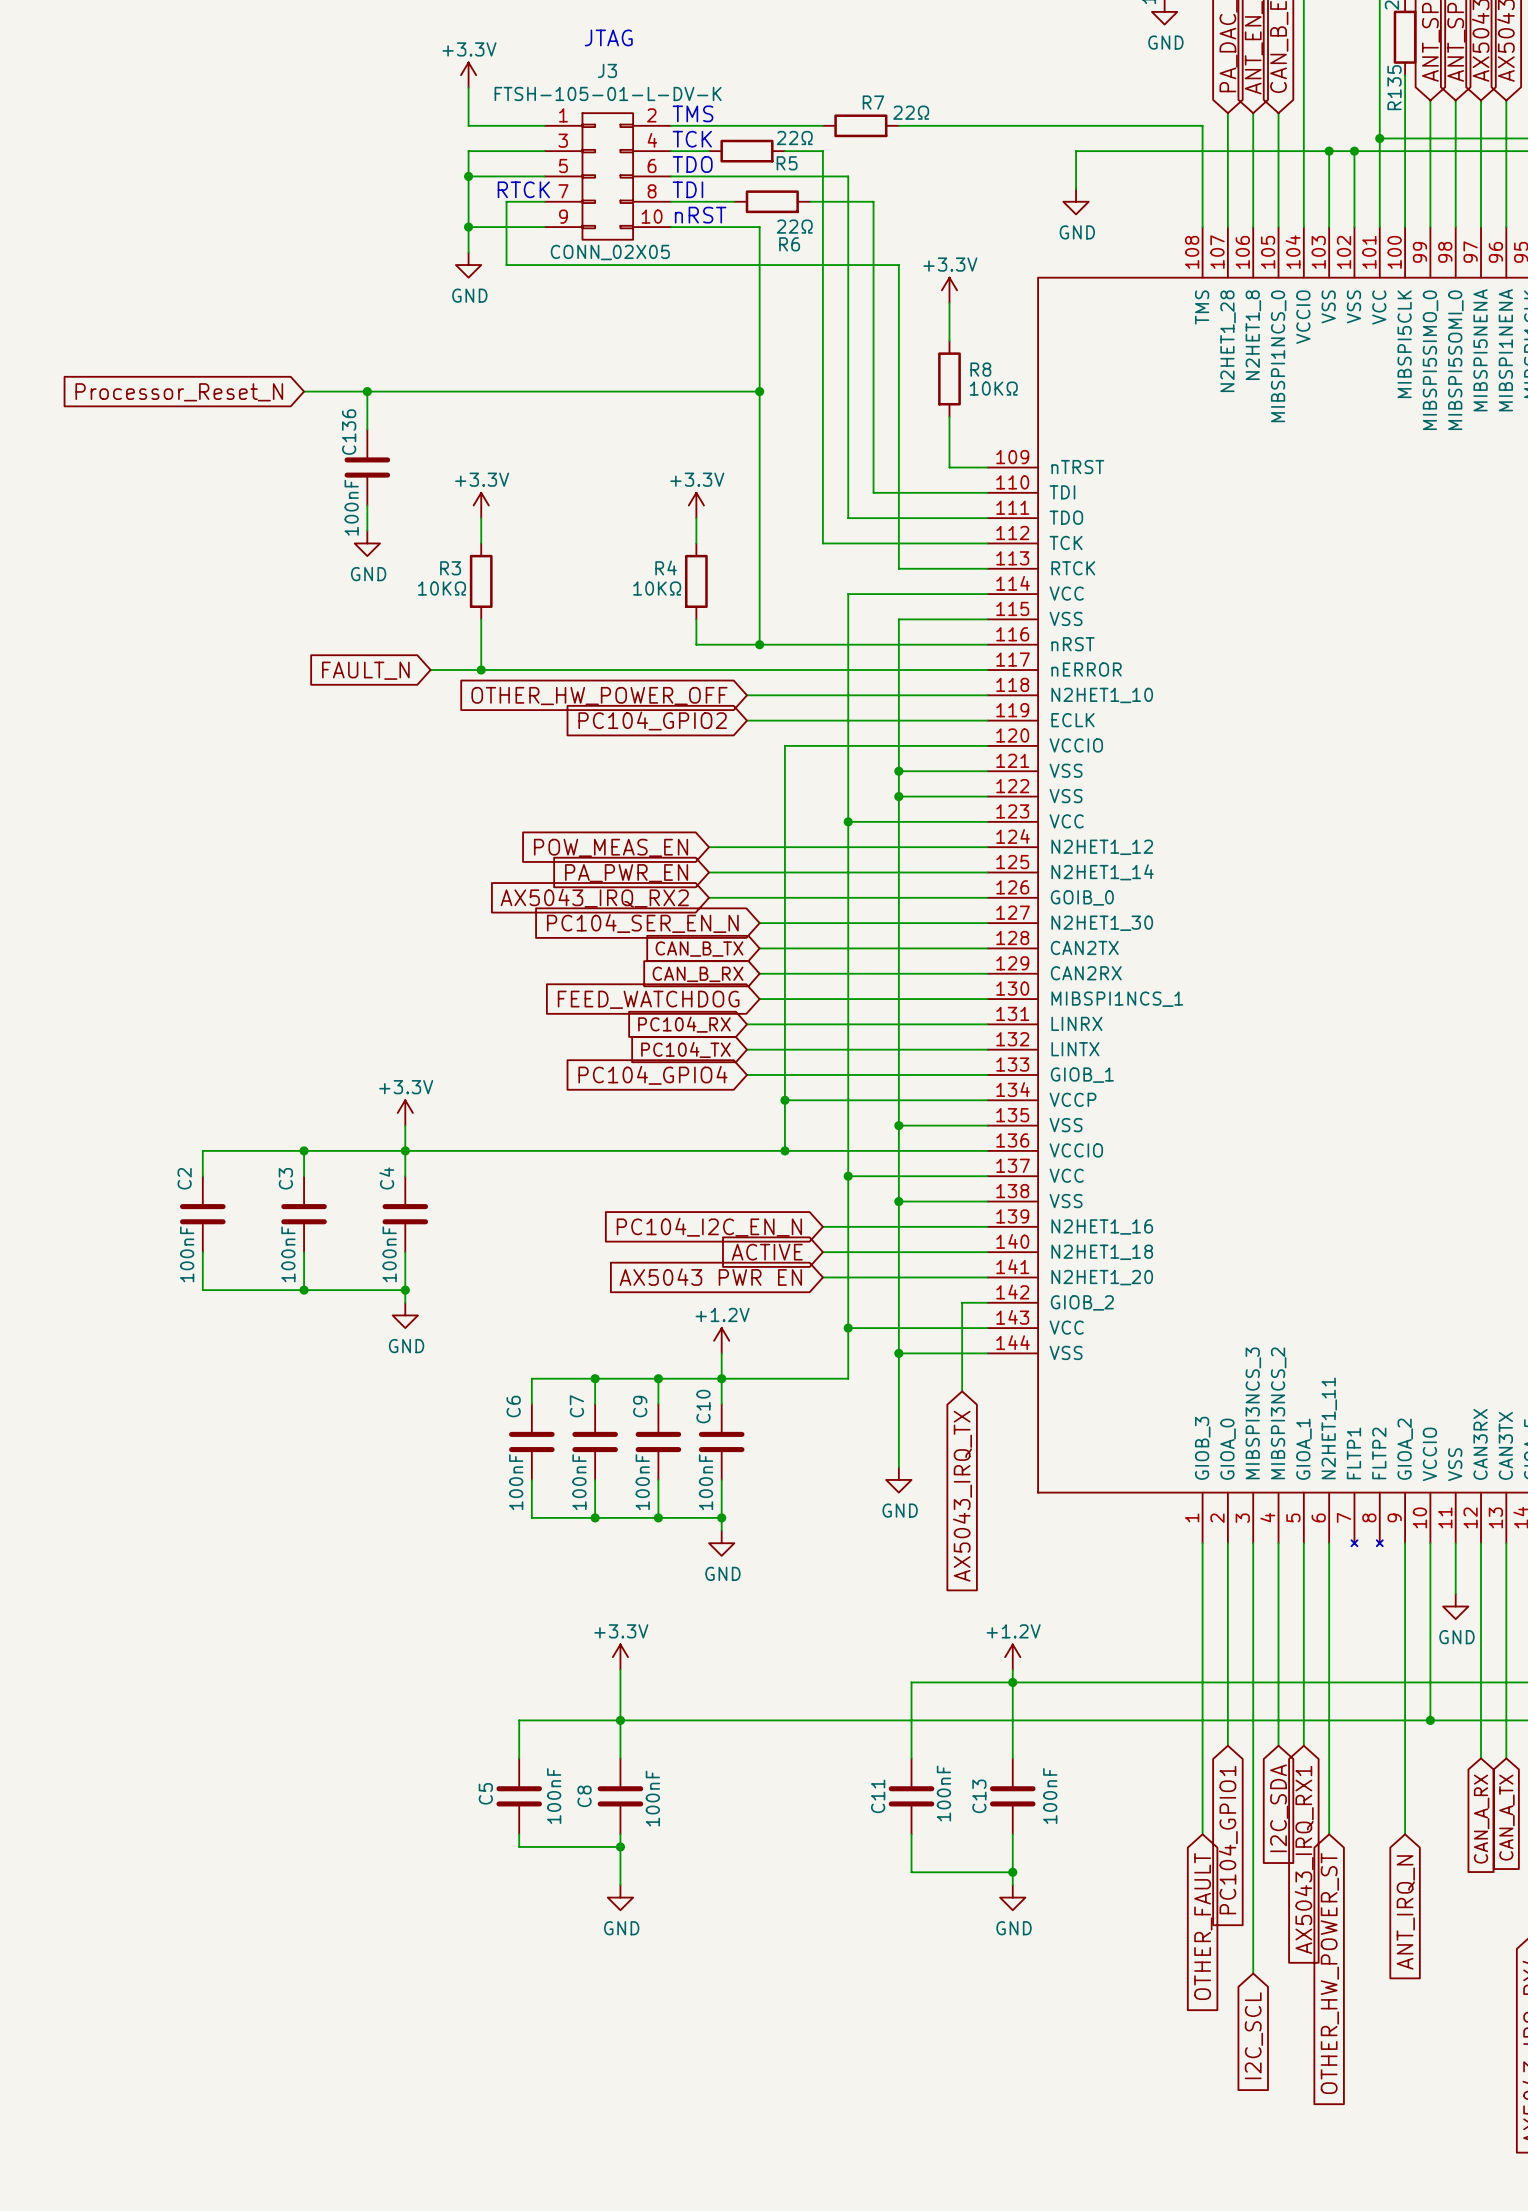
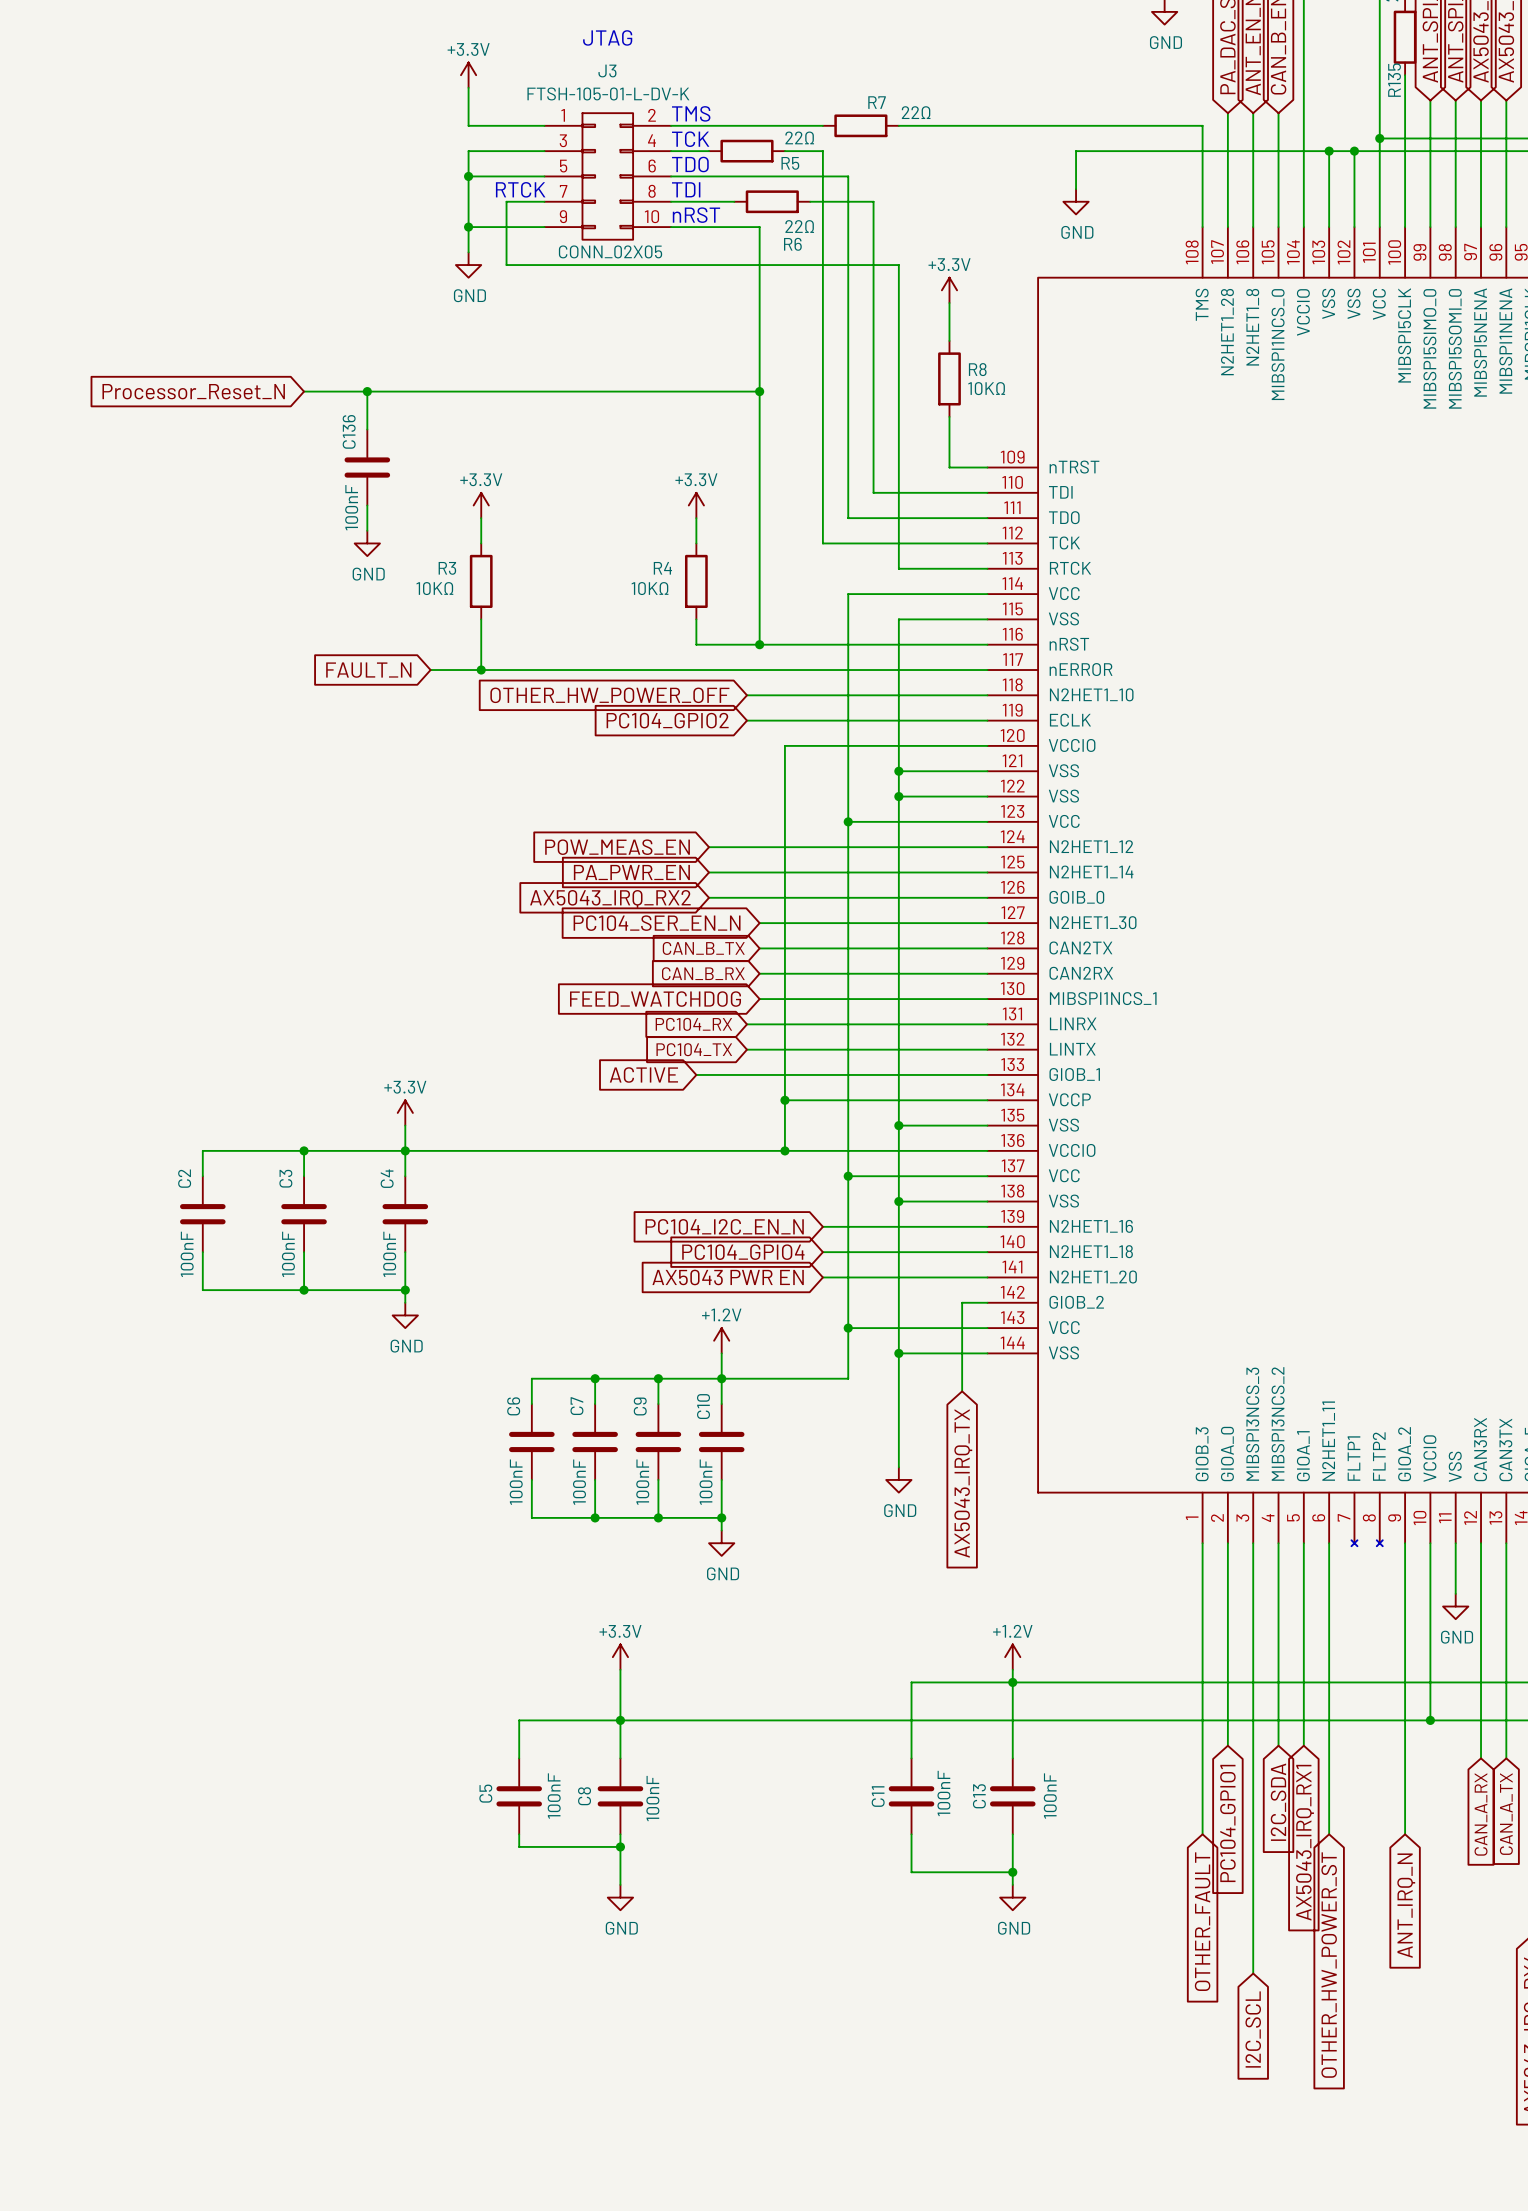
global label: none -> ACTIVE (643, 1074)
wire: none -> (696, 1074) (746, 1074)
global label: PC104_GPIO4 (652, 1075) -> none
global label: ACTIVE (767, 1252) -> PC104_GPIO4 (743, 1252)

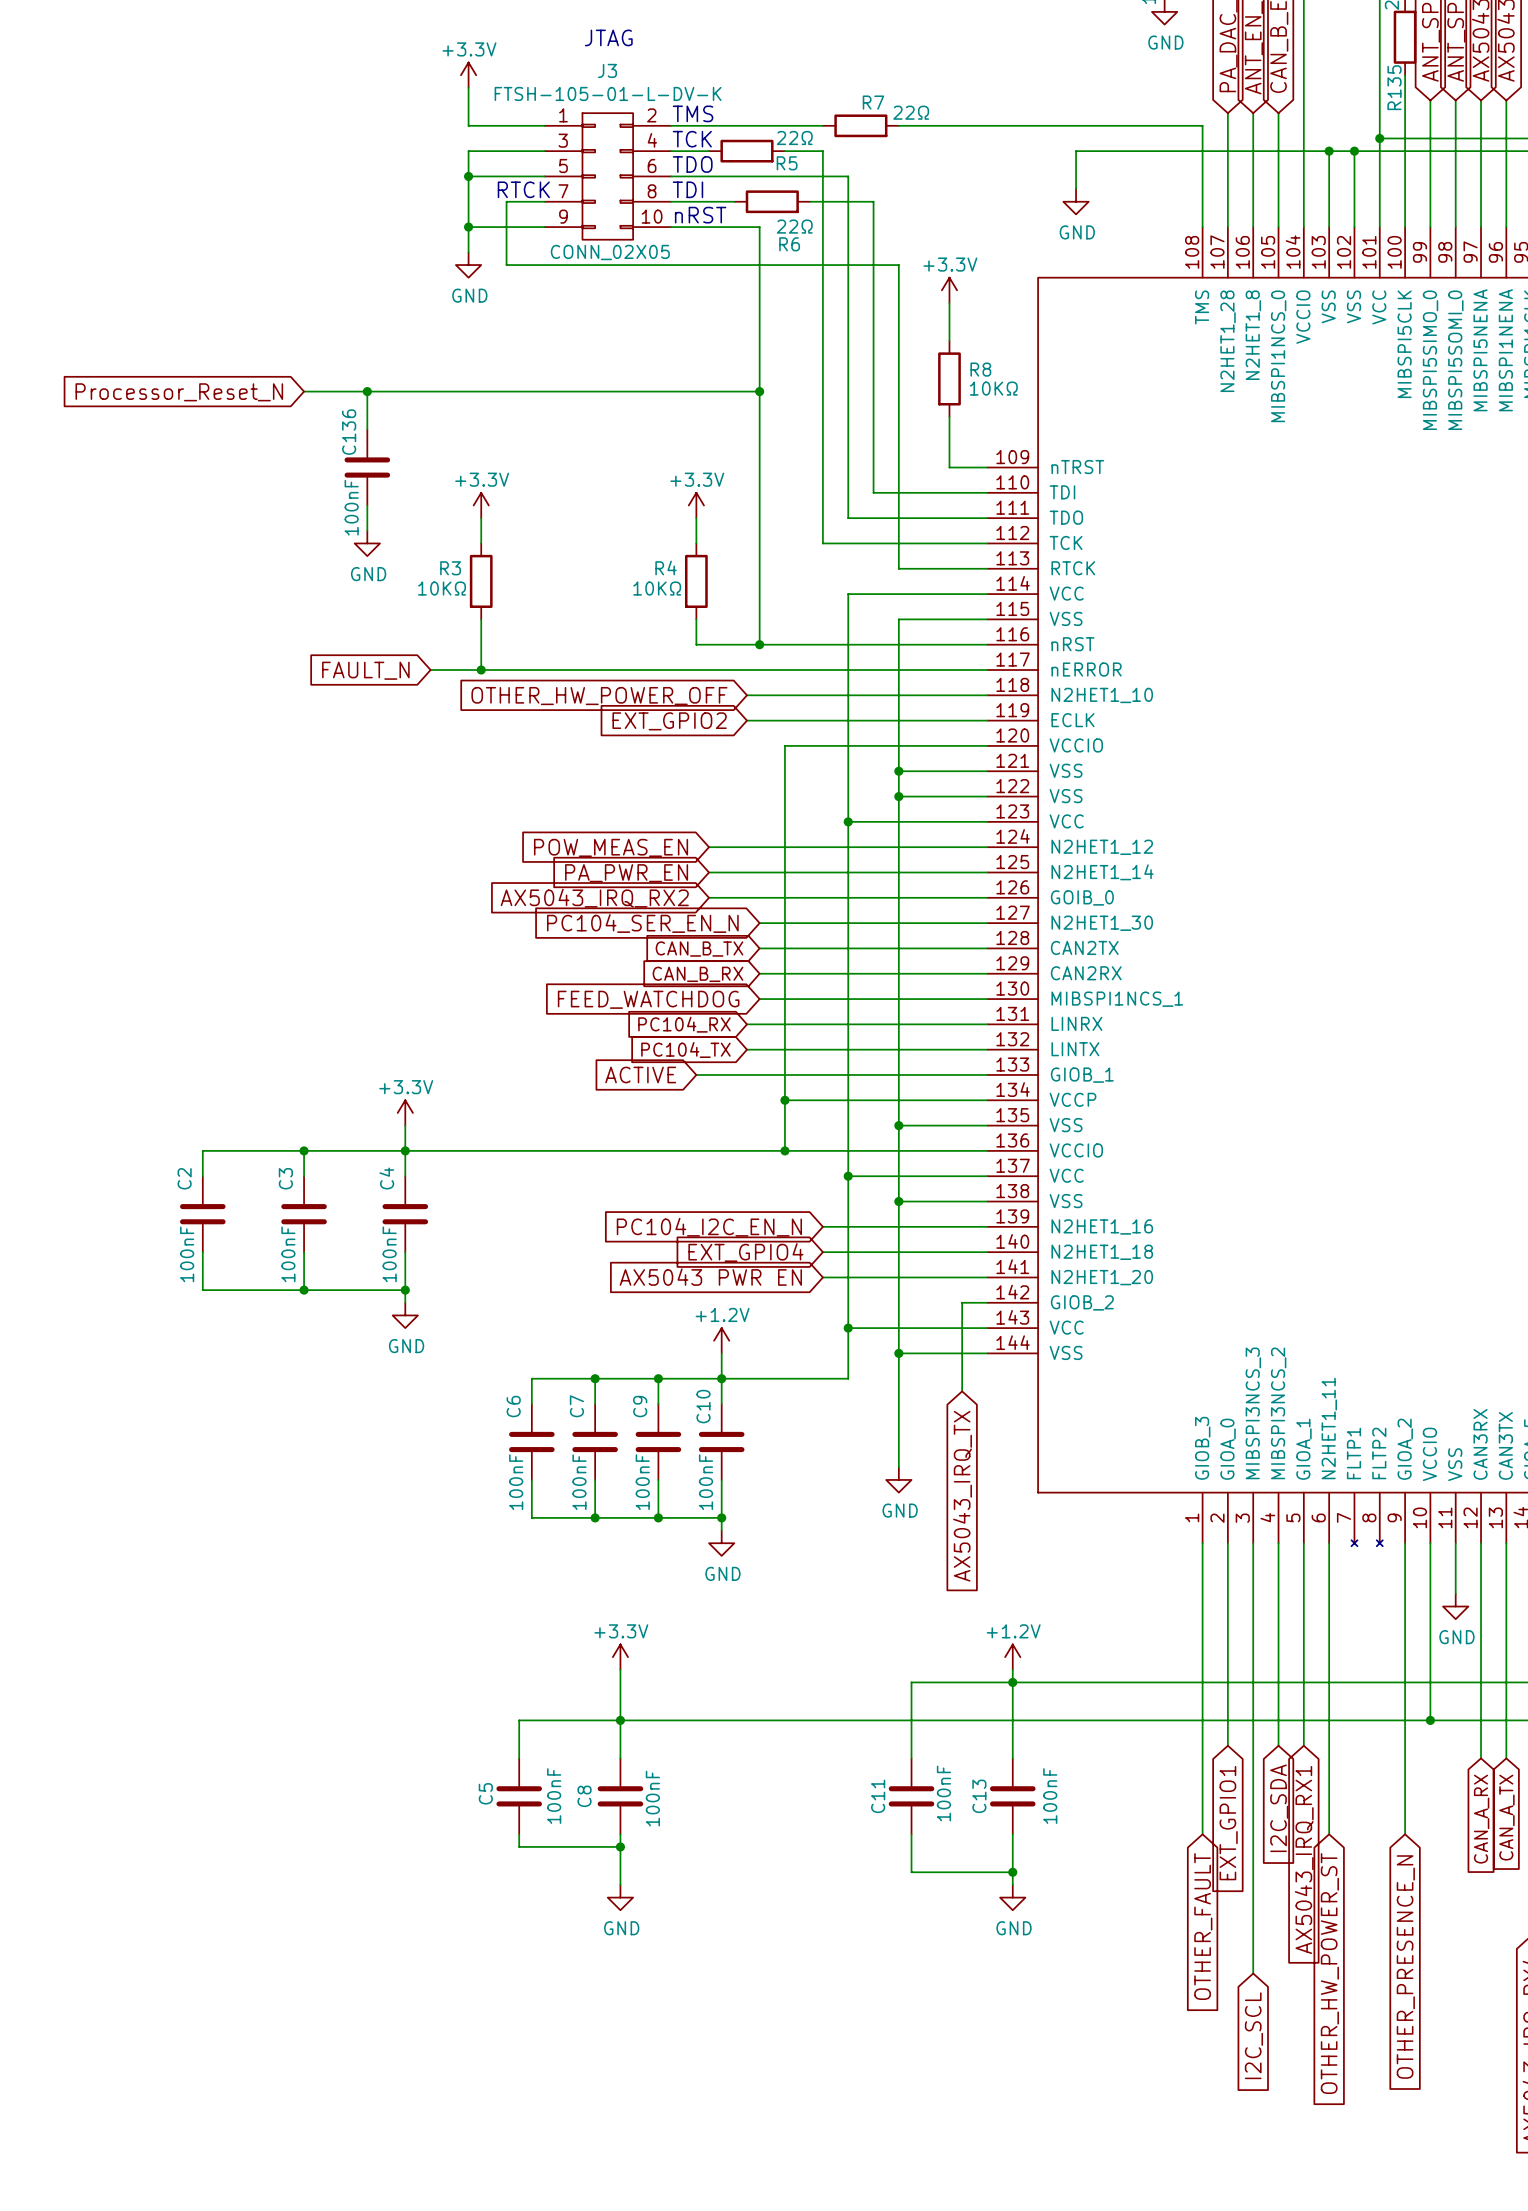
global label: PC104_GPIO2 (667, 720) -> EXT_GPIO2 (669, 721)
global label: PC104_GPIO4 (743, 1252) -> EXT_GPIO4 (745, 1252)
global label: PC104_GPIO1 (1227, 1823) -> EXT_GPIO1 (1228, 1823)
global label: ANT_IRQ_N (1406, 1905) -> OTHER_PRESENCE_N (1405, 1967)

